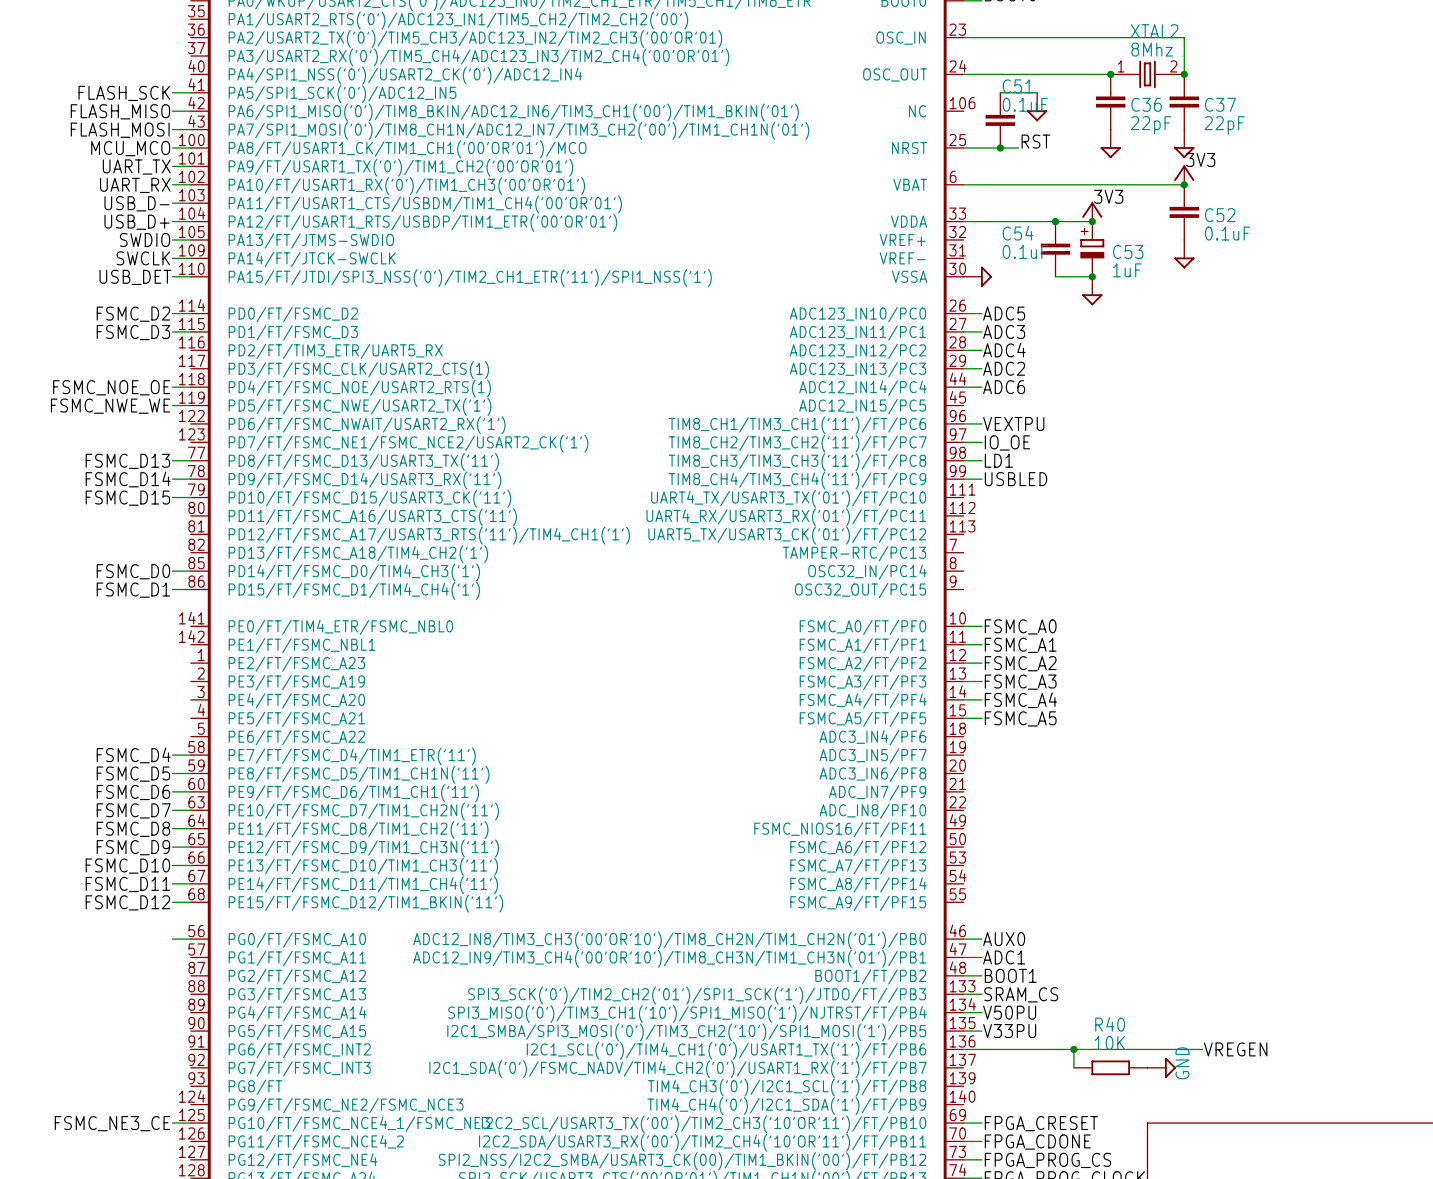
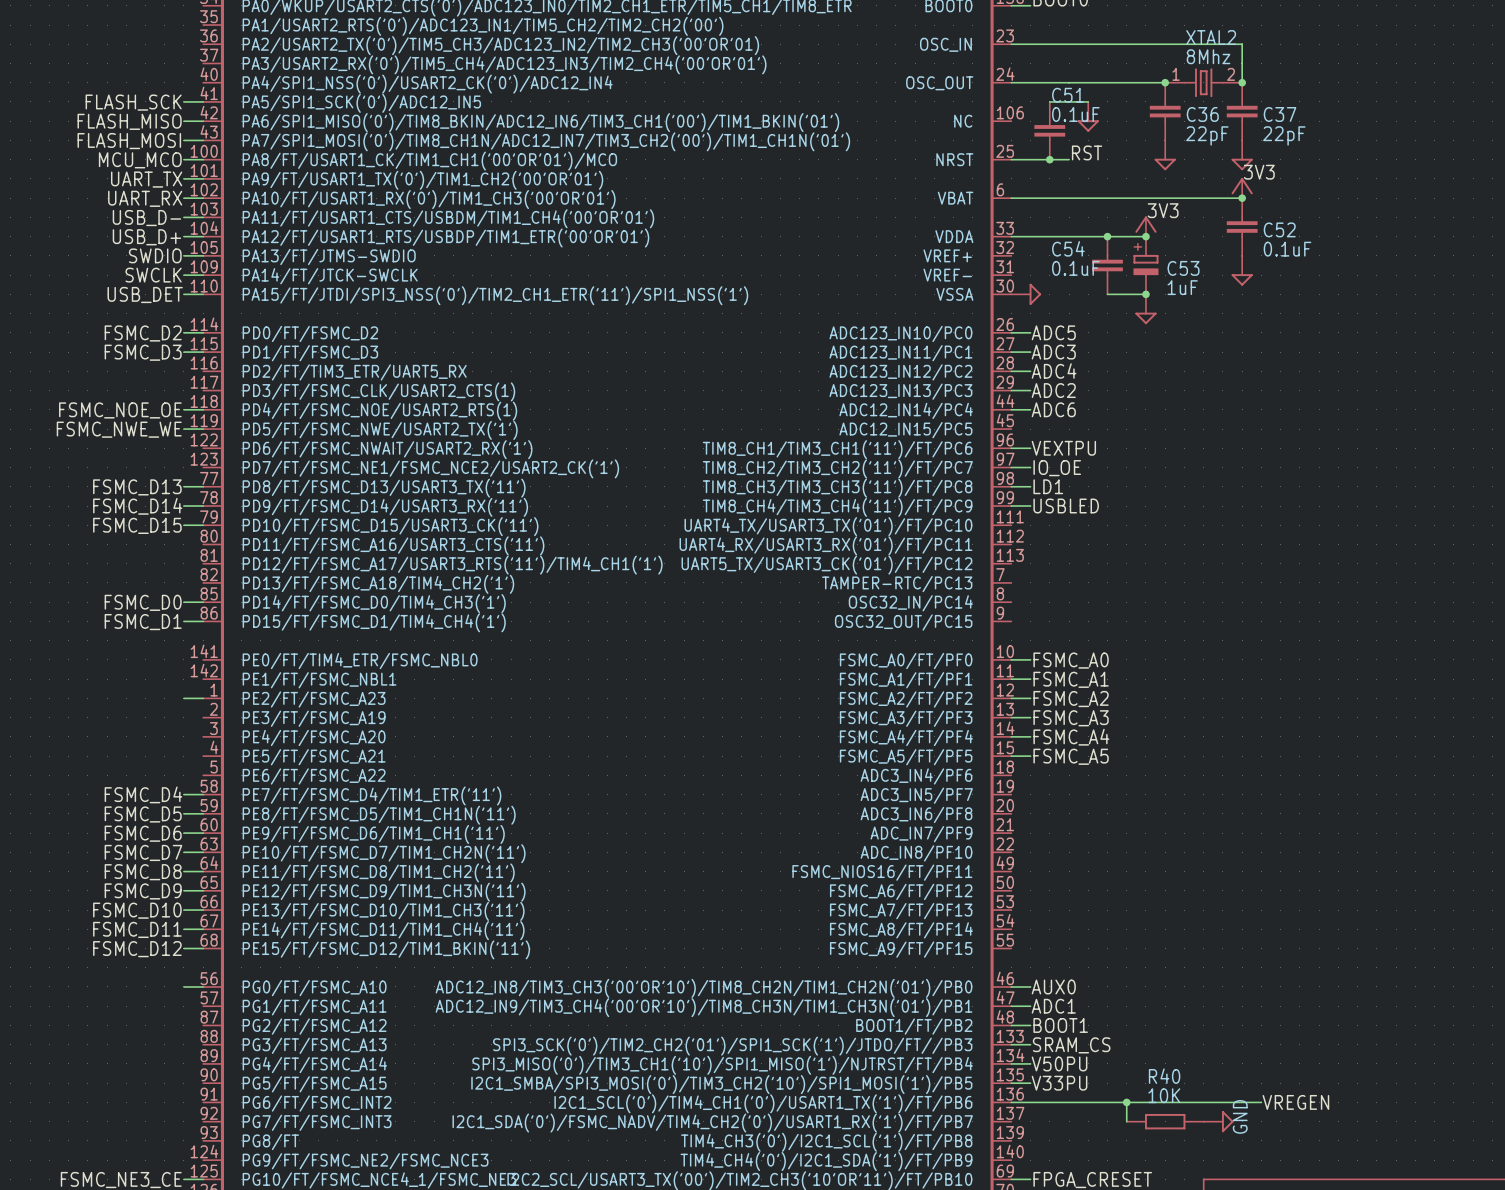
wire: none -> (183, 698) (203, 698)

